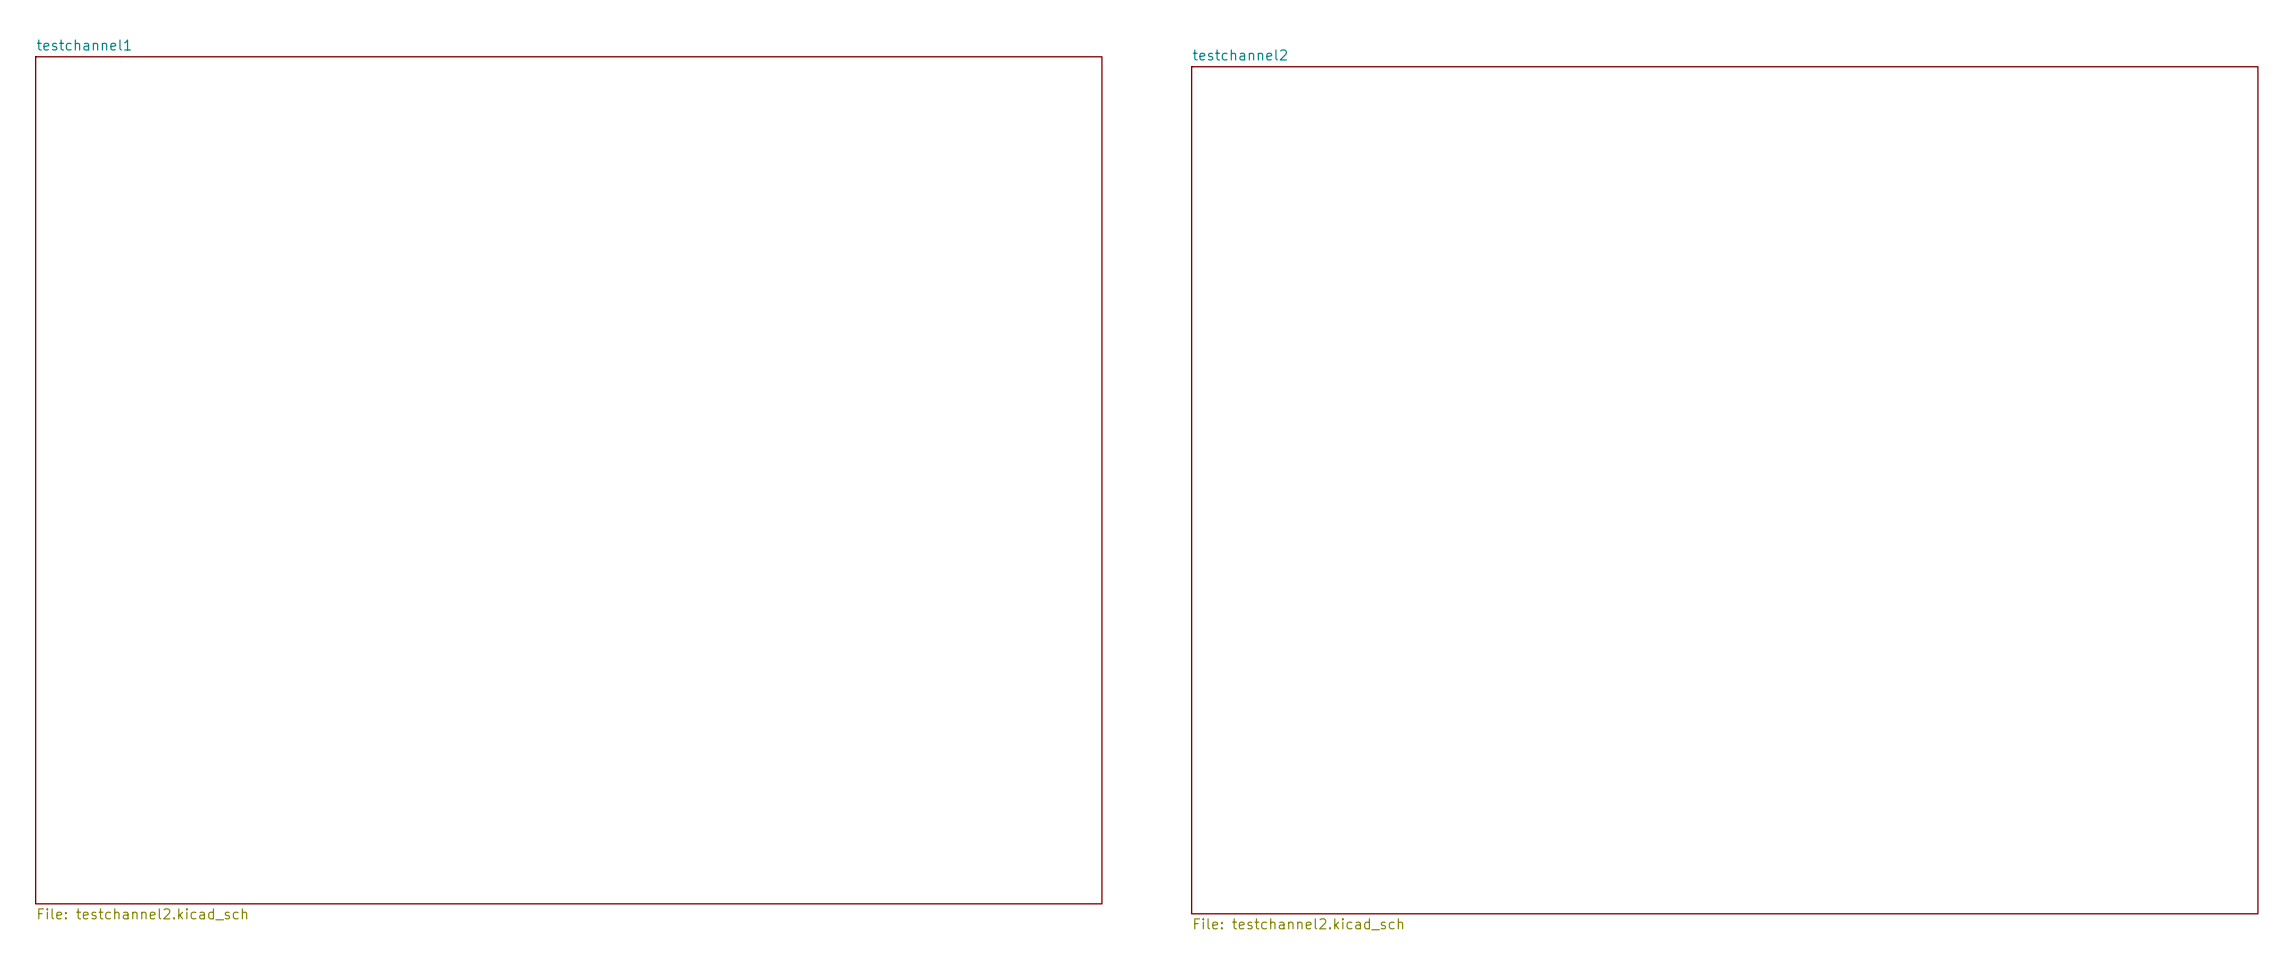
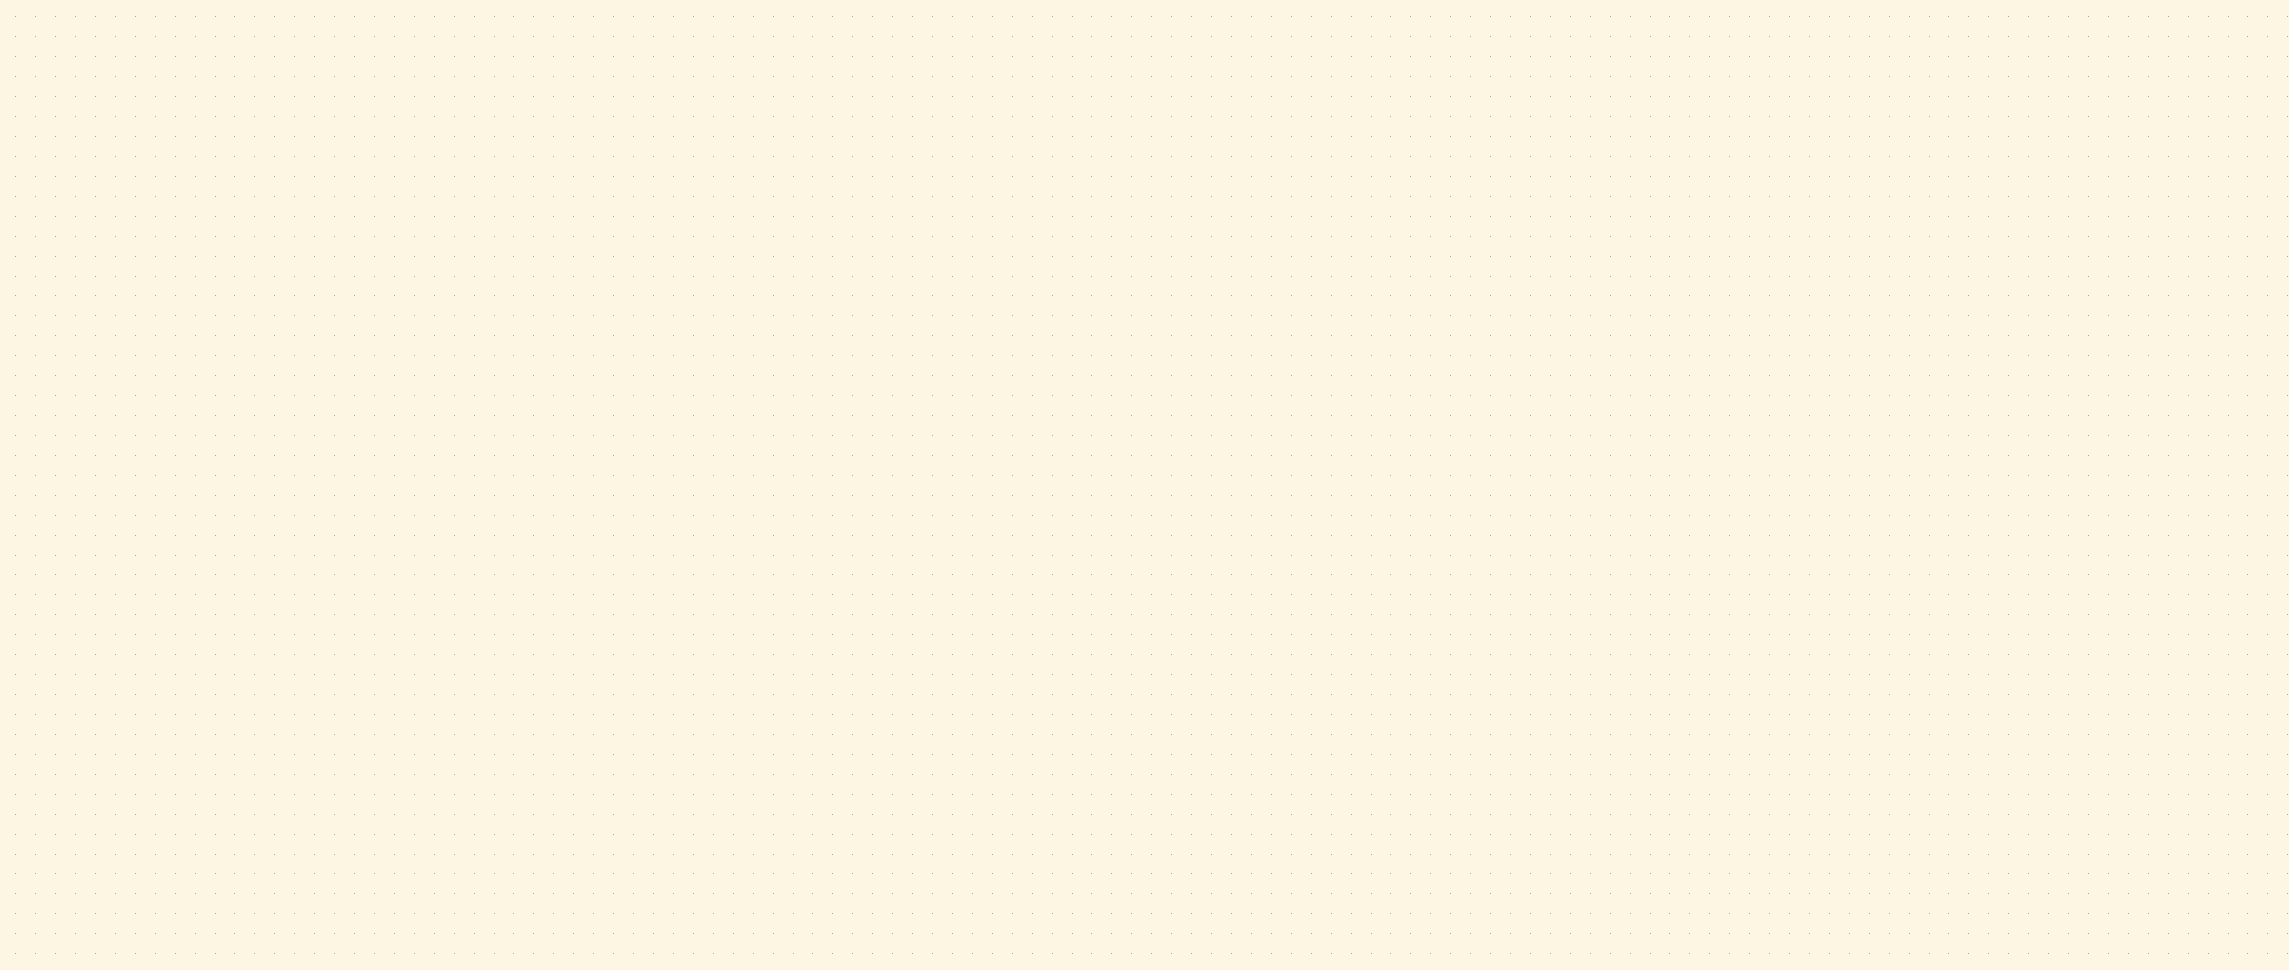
sheet testchannel1: File: testchannel2.kicad_sch (568, 480) -> none
sheet testchannel2: File: testchannel2.kicad_sch (1724, 490) -> none

